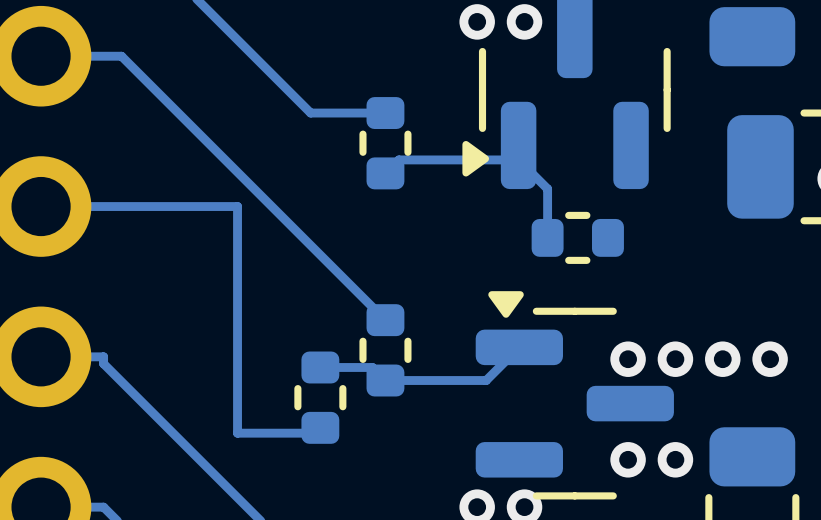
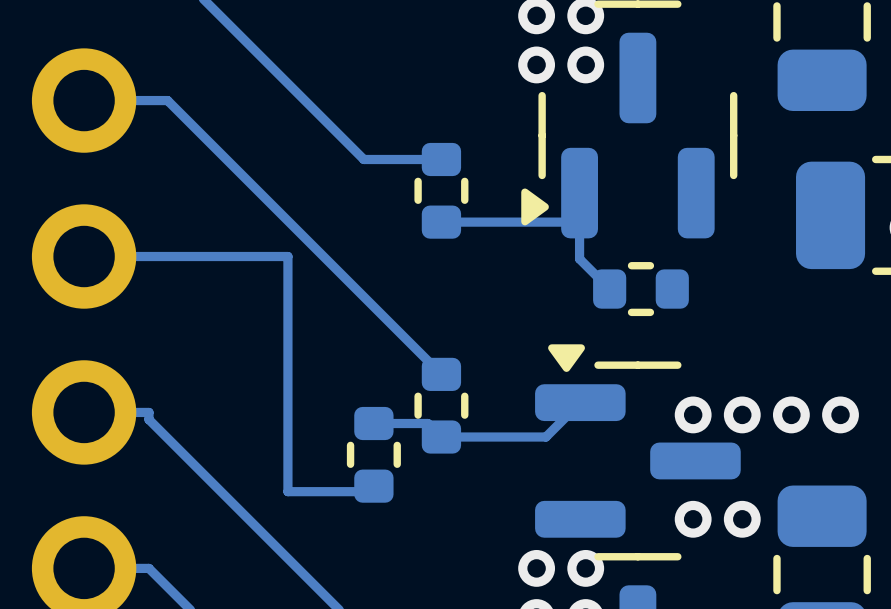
track: none -> (579, 208) (579, 258) (609, 289)
track: (385, 173) (398, 159) (518, 159) (547, 188) (547, 237) -> (441, 222) (579, 222)

